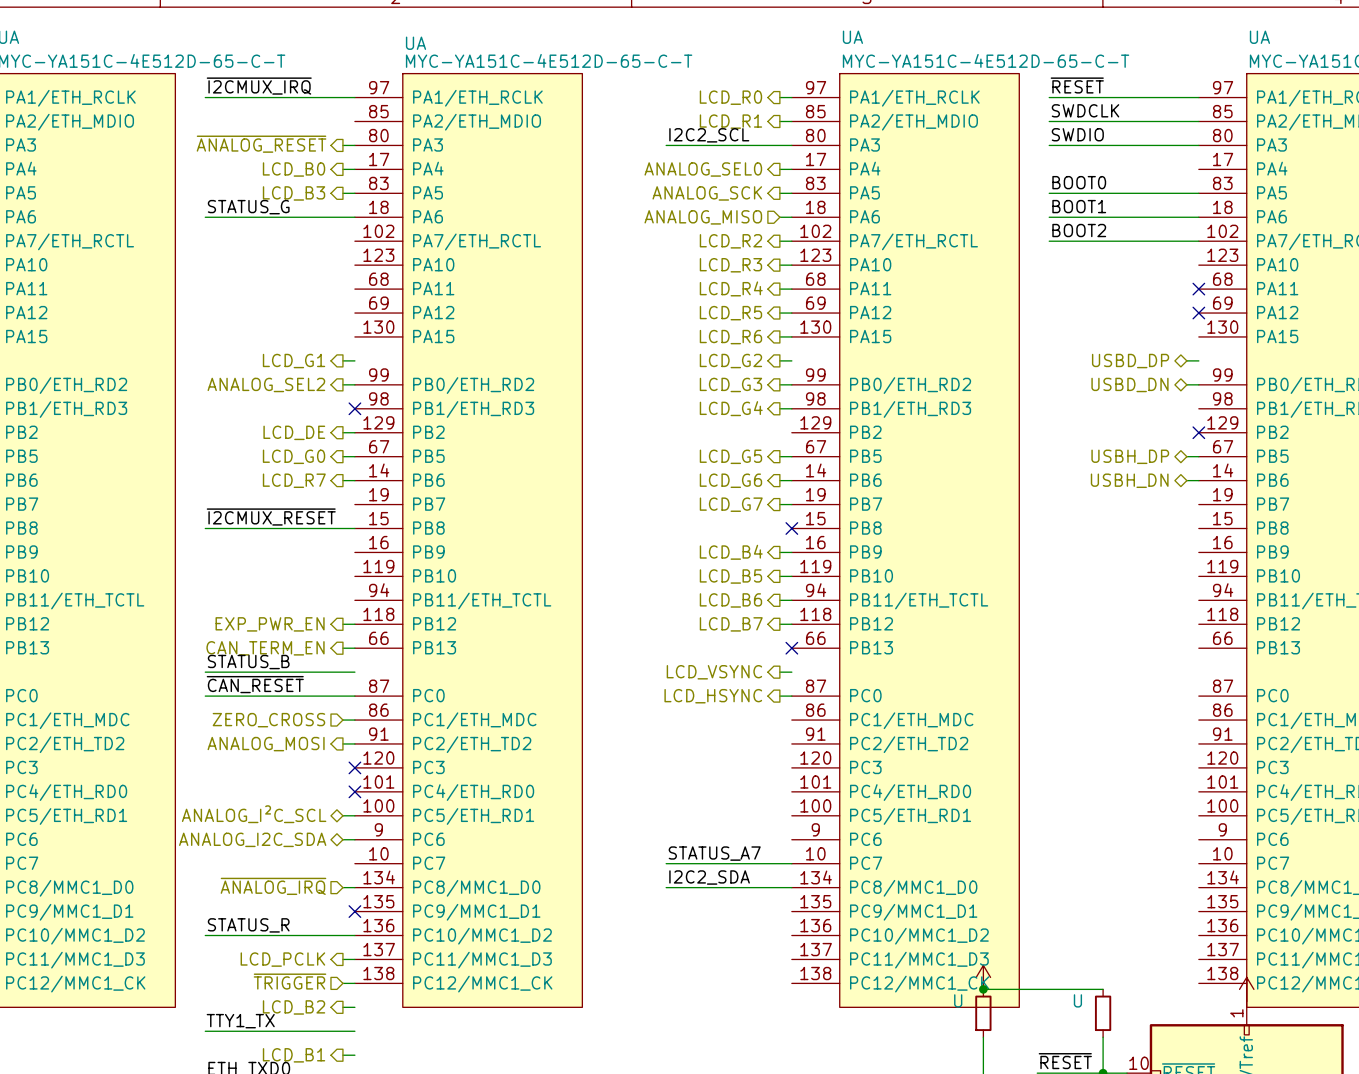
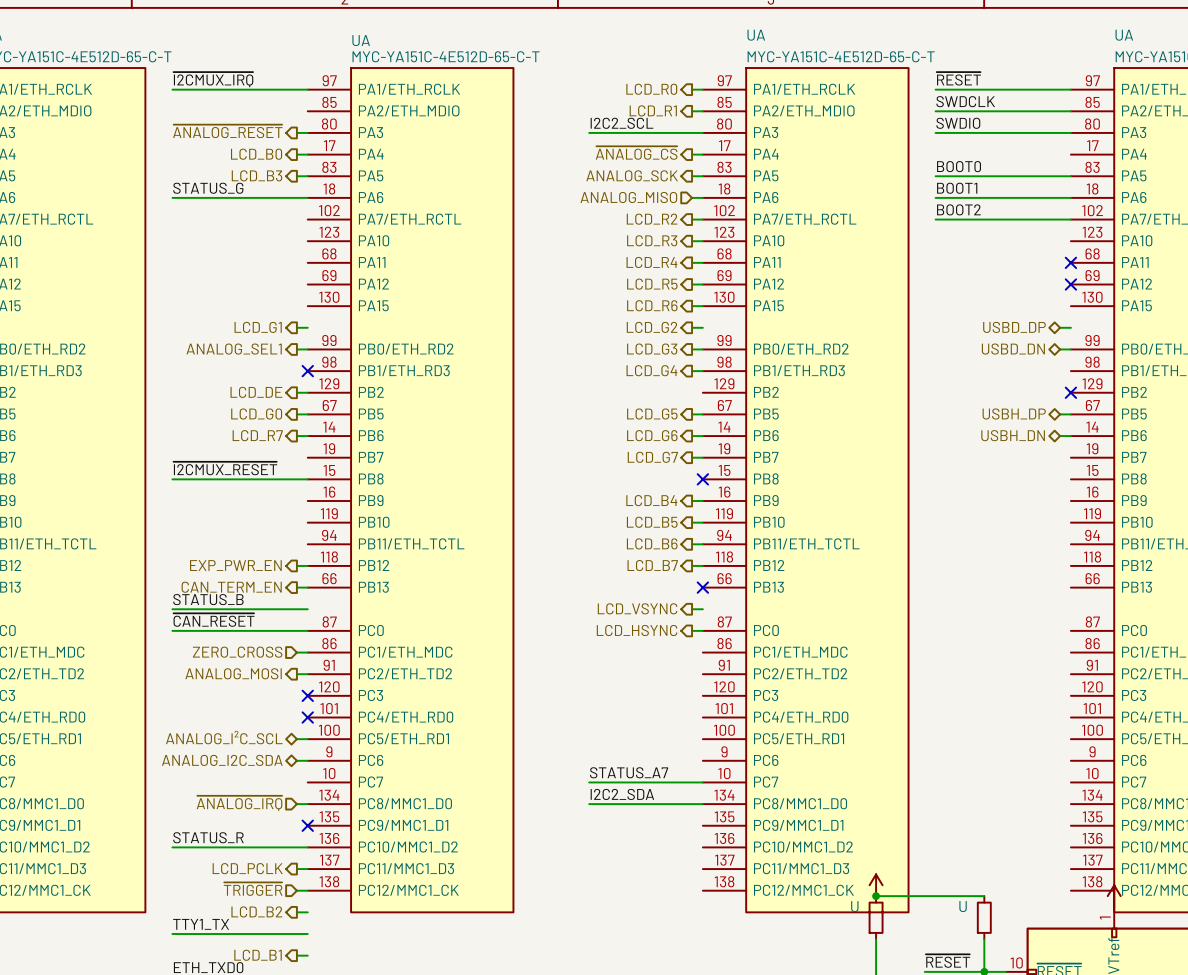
hierarchical label: ANALOG_SEL0 (703, 169) -> ~{ANALOG_CS} (636, 153)
hierarchical label: ANALOG_SEL2 (266, 384) -> ANALOG_SEL1 (234, 349)

